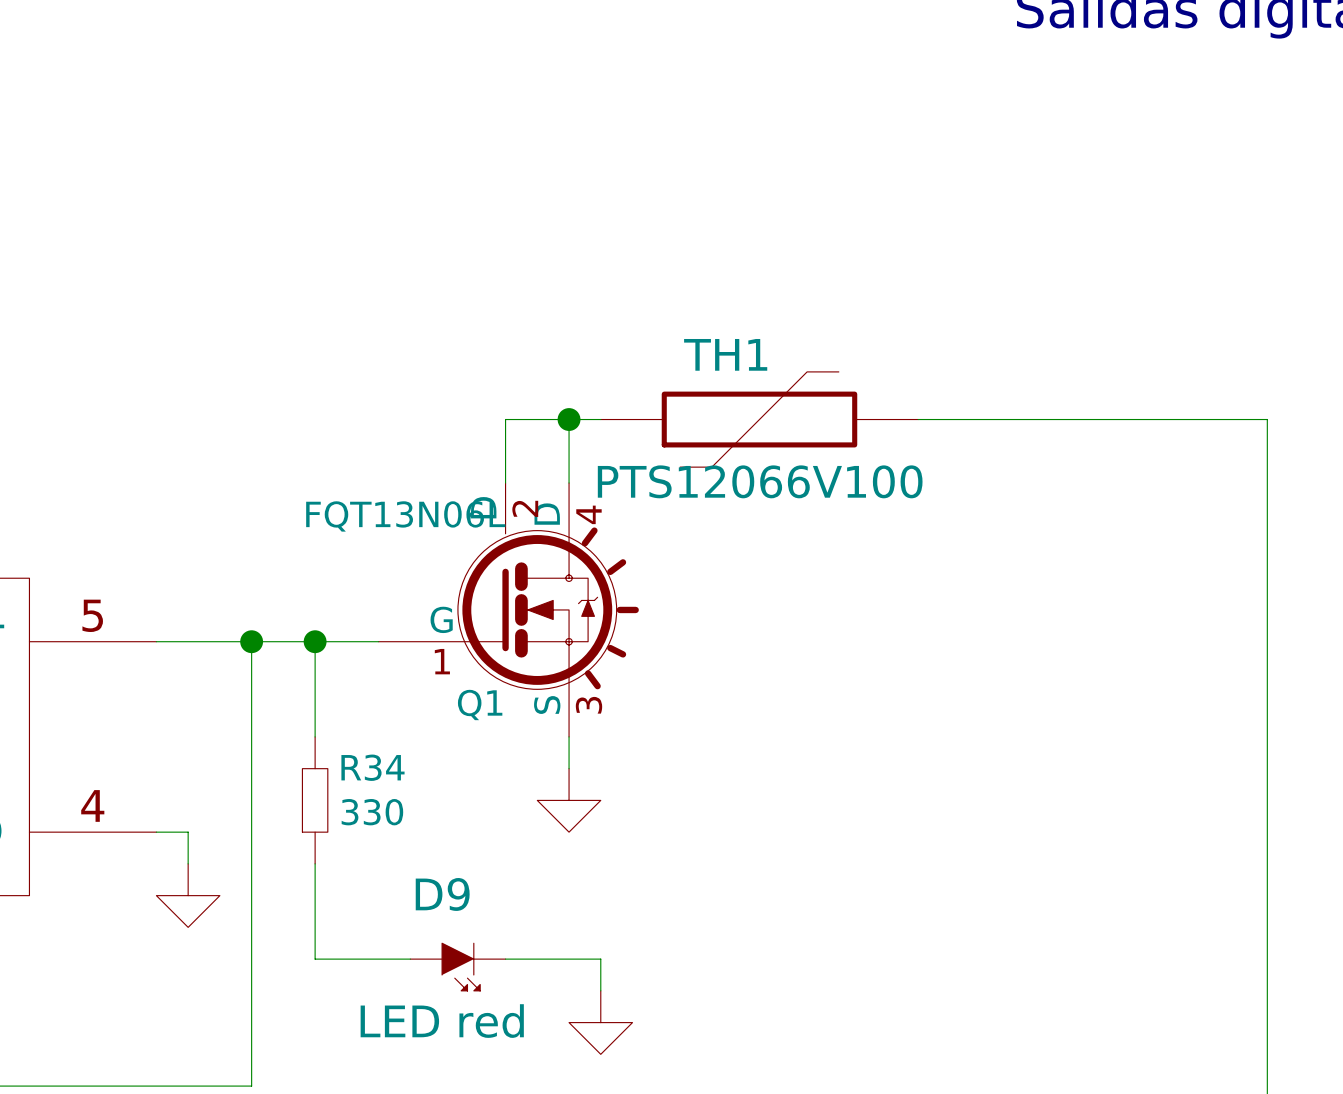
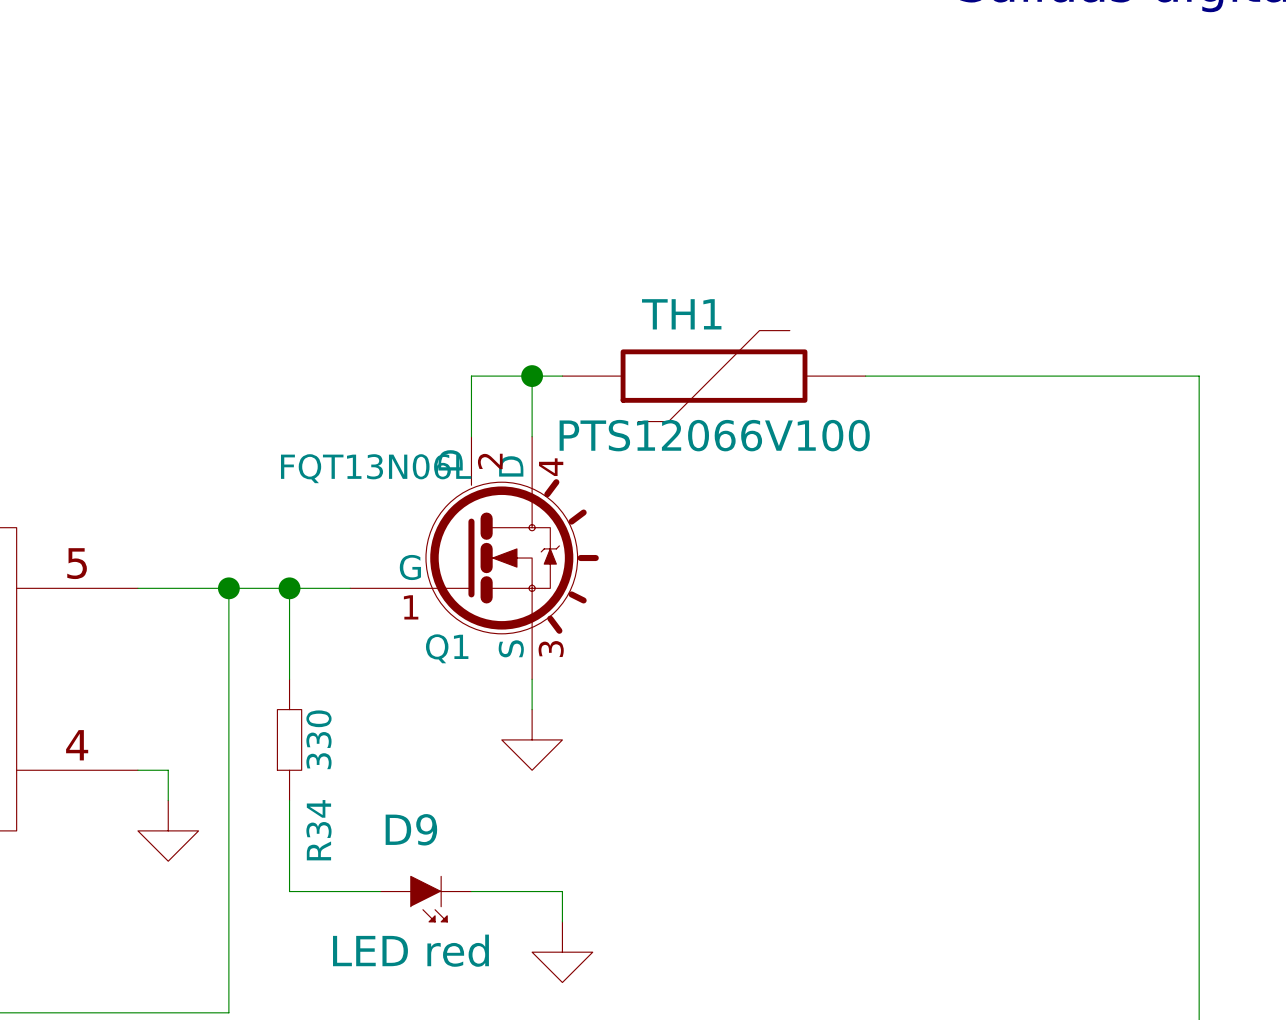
R34 name rotation: 0° (372, 767) -> 90° counterclockwise (318, 830)
R34 name position: R34 (372, 767) -> R34 (318, 830)
R34 value rotation: 0° (372, 812) -> 90° counterclockwise (318, 739)

